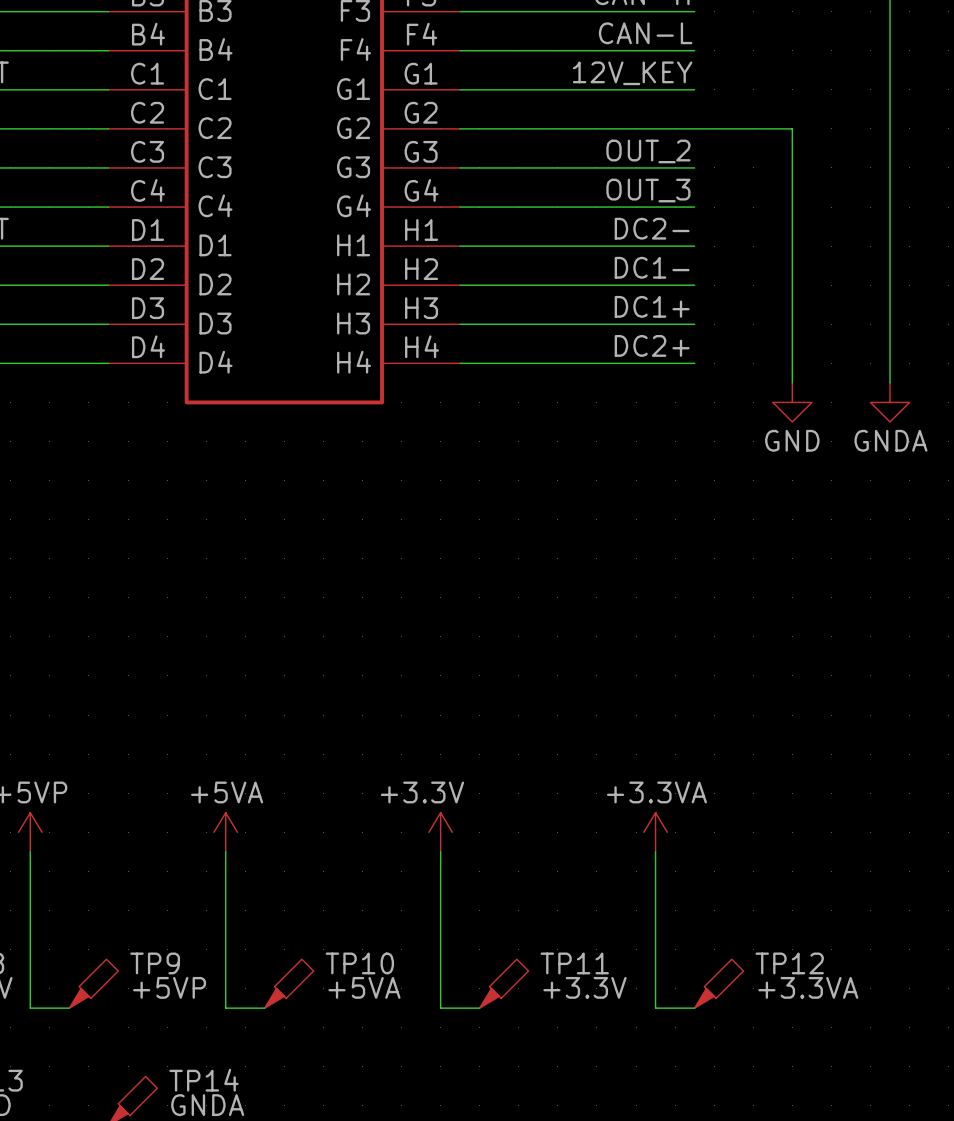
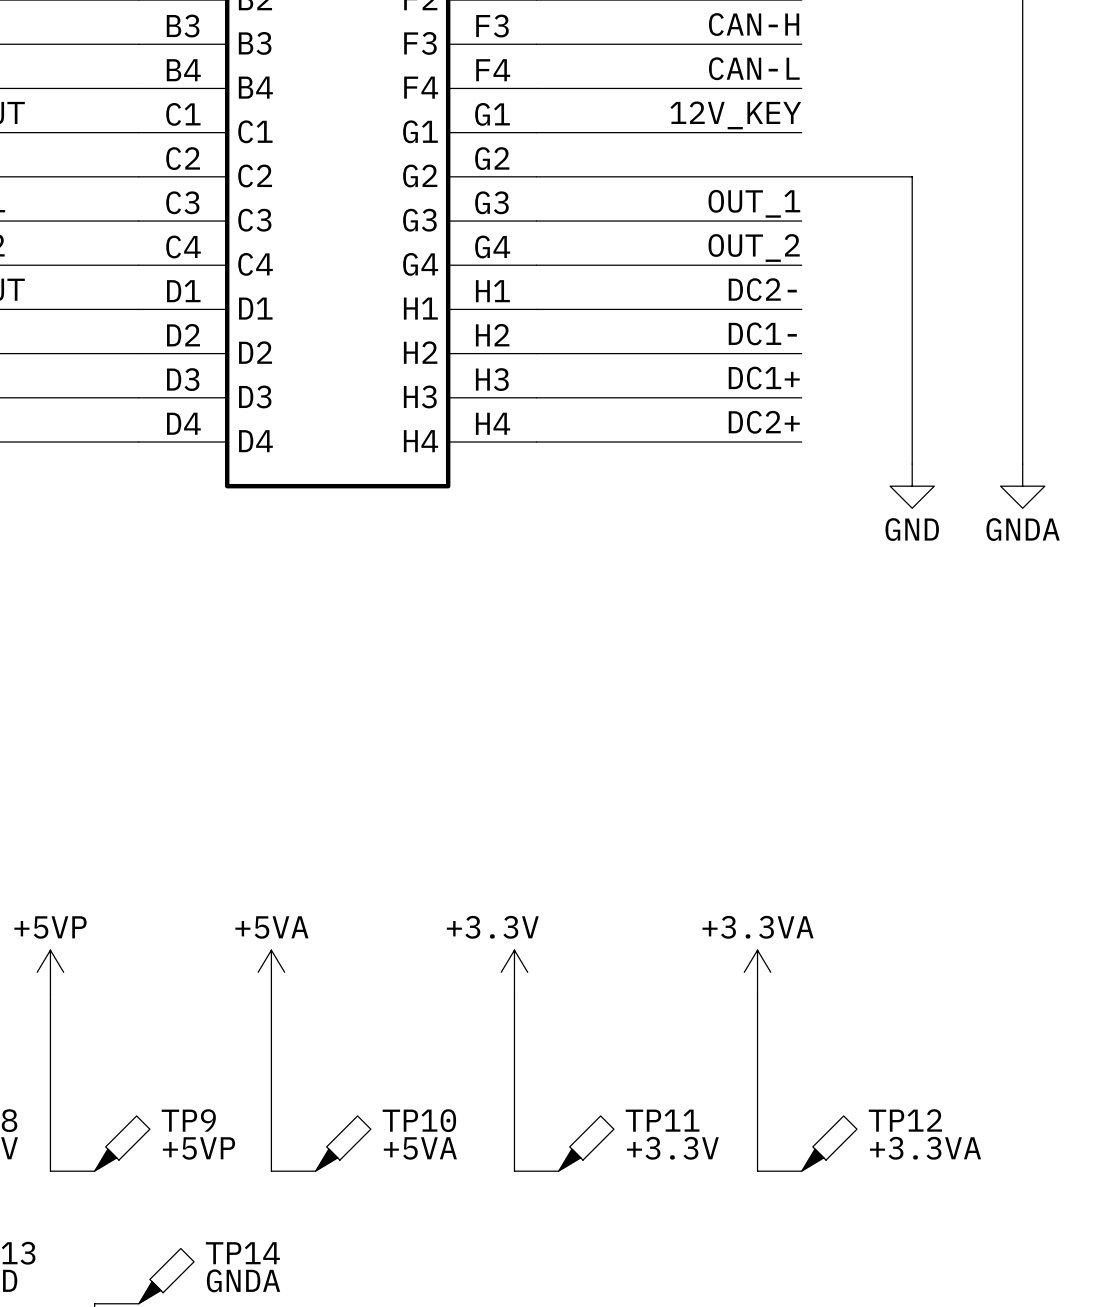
label: OUT_2 (648, 151) -> OUT_1 (754, 203)
label: OUT_3 (648, 190) -> OUT_2 (754, 247)

